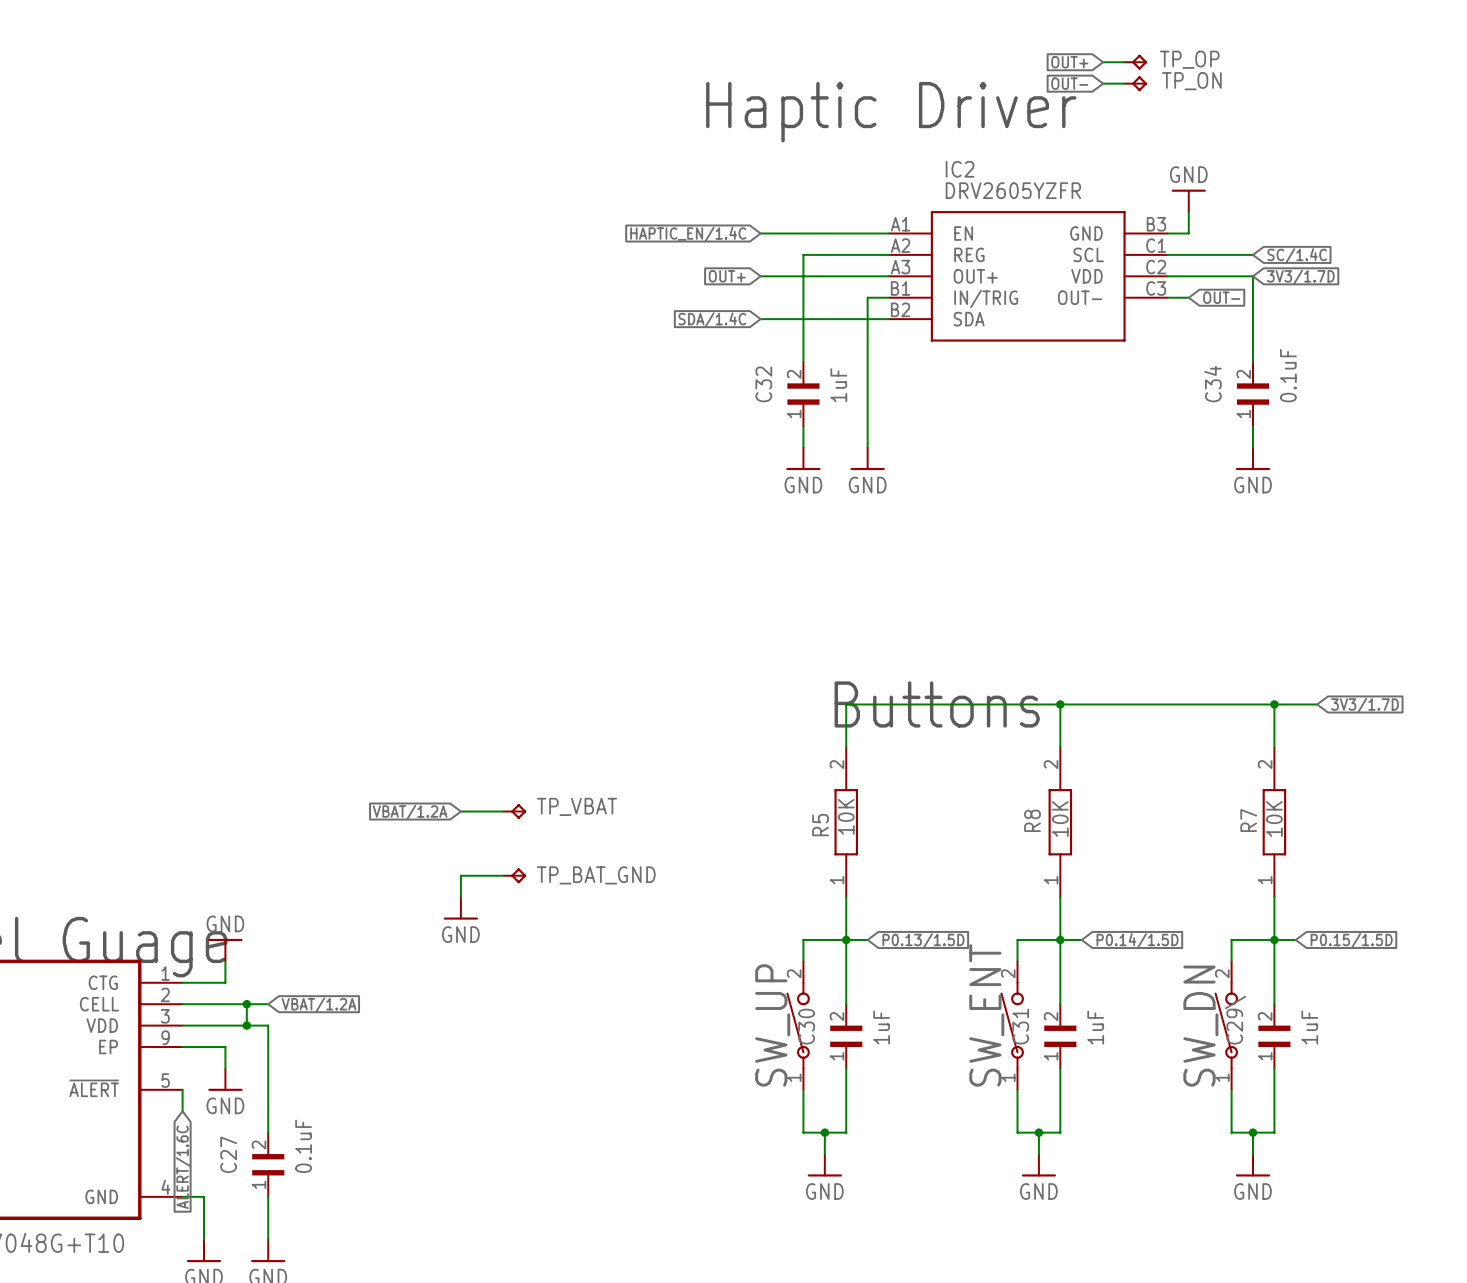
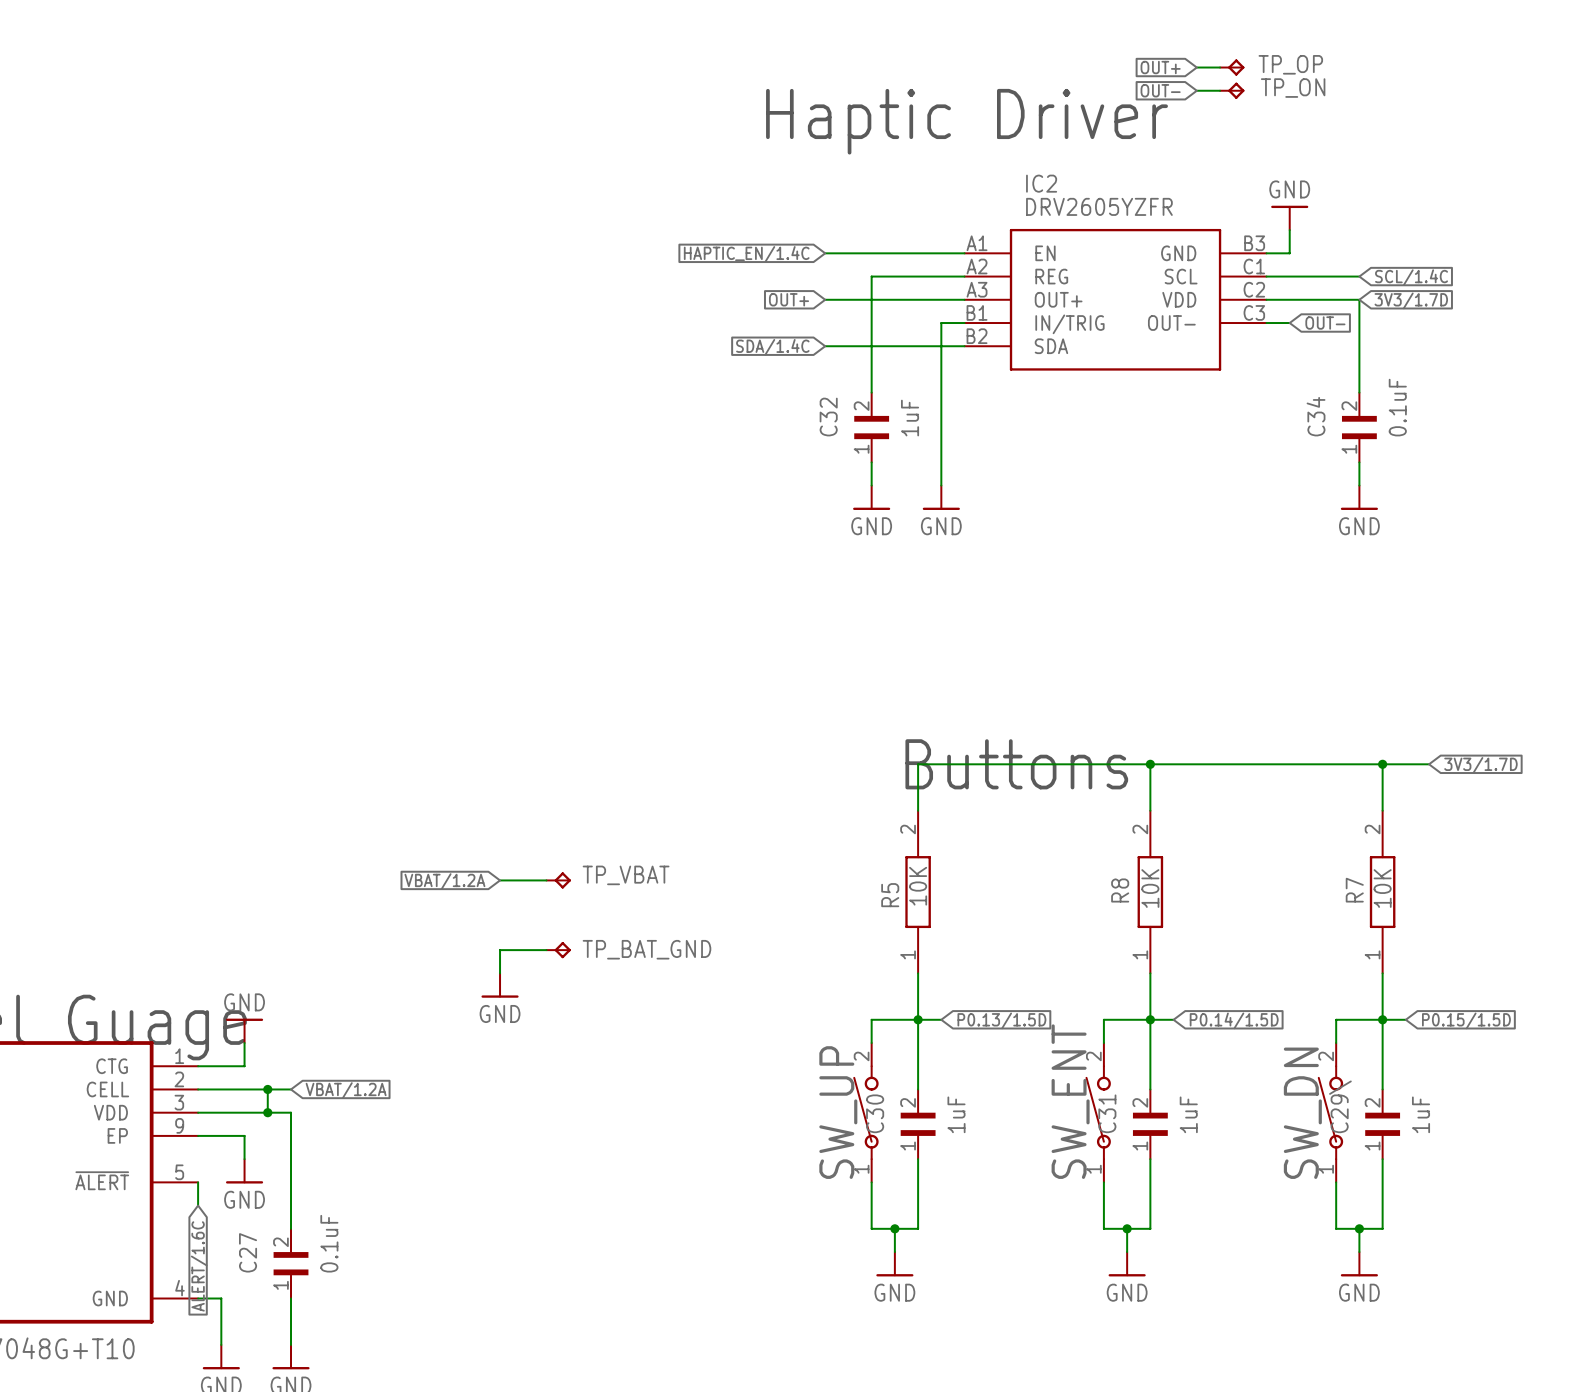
global label: SC/1.4C (1297, 255) -> SCL/1.4C (1411, 277)

